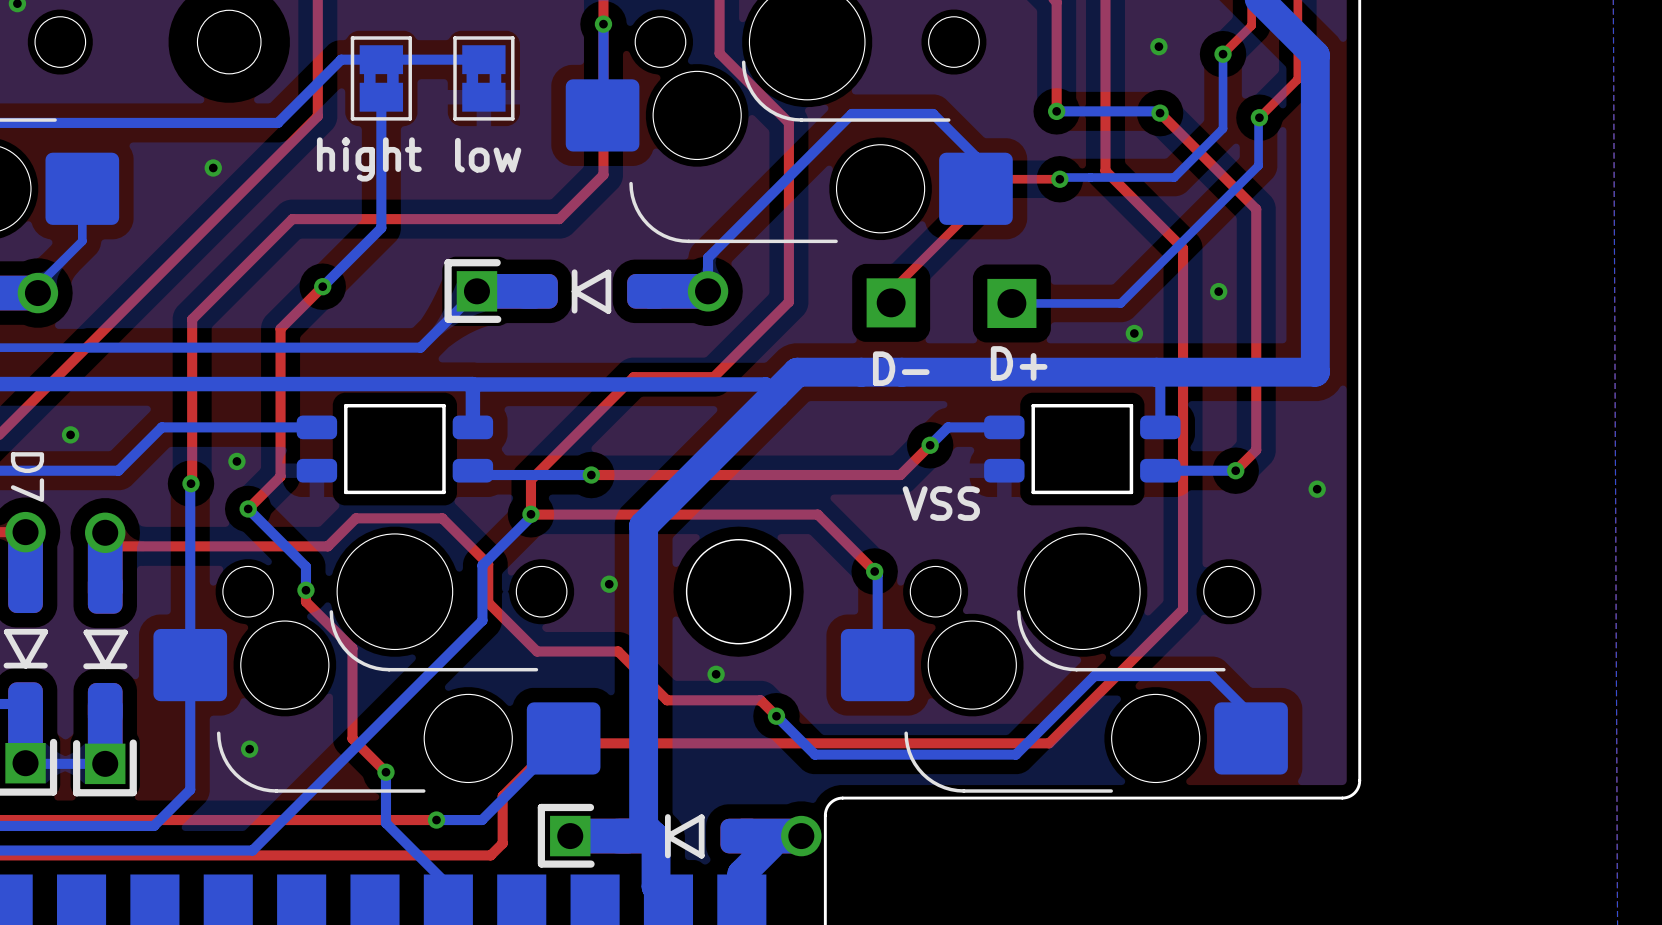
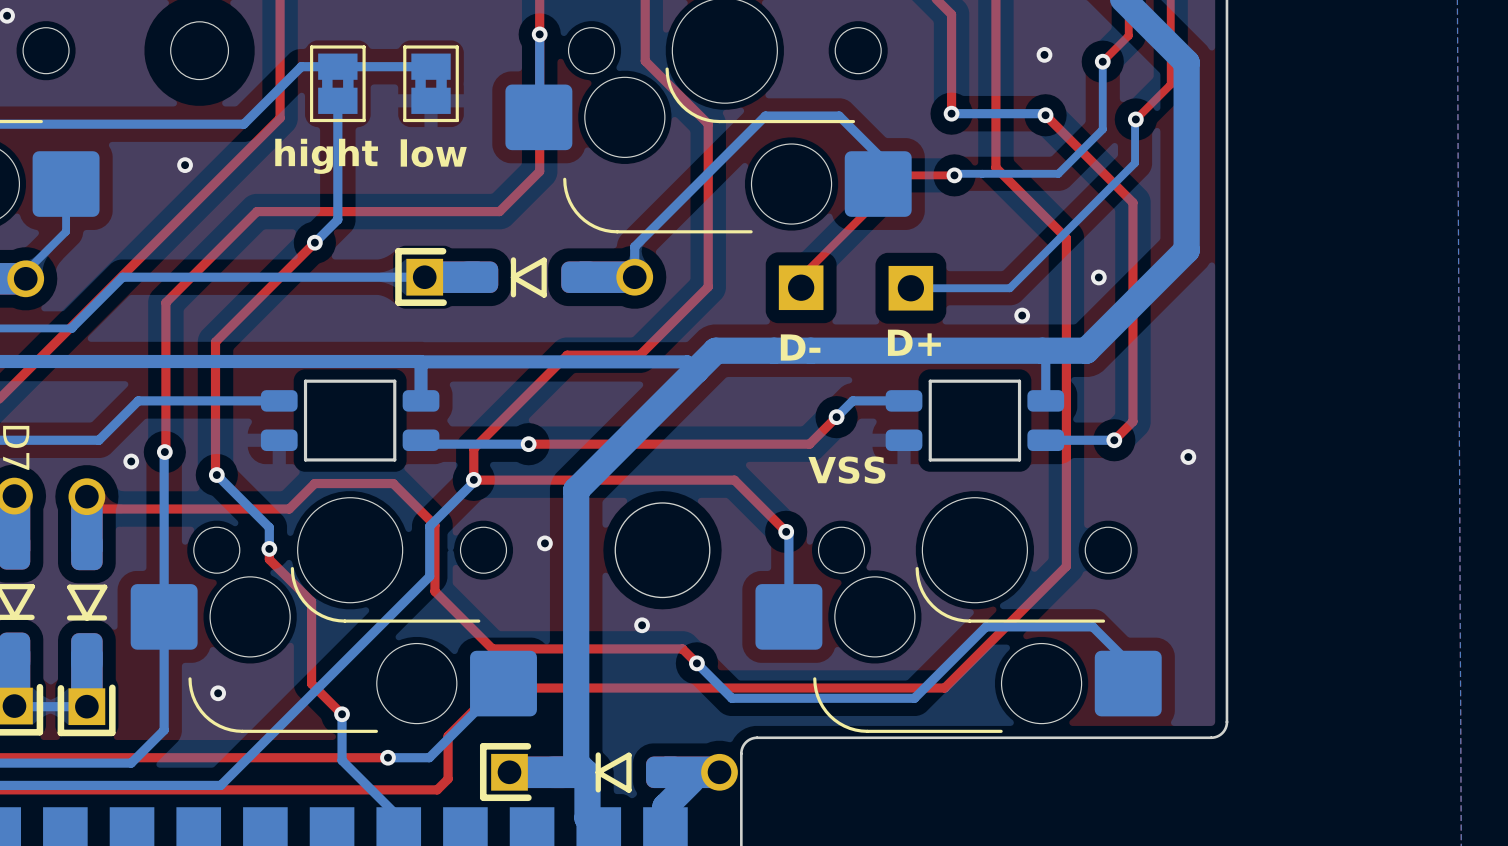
top track: none -> (314, 242) (284, 273)
bottom track: (356, 253) (322, 286) -> none
bottom track: (1315, 261) (1315, 372) (1204, 372) -> (1186, 250) (1086, 350)
via position: (322, 286) -> (314, 242)
bottom track: (476, 291) (420, 347) (88, 347) -> (424, 277) (122, 277) (71, 327)
top track: (280, 328) (280, 476) (248, 508) -> (246, 311) (215, 342) (216, 475)
via: (70, 434) -> none
via: (236, 461) -> none
via: none -> (131, 461)
top track: (488, 602) (537, 651) (618, 651) (667, 700) -> (434, 560) (434, 591) (492, 648) (597, 648)

